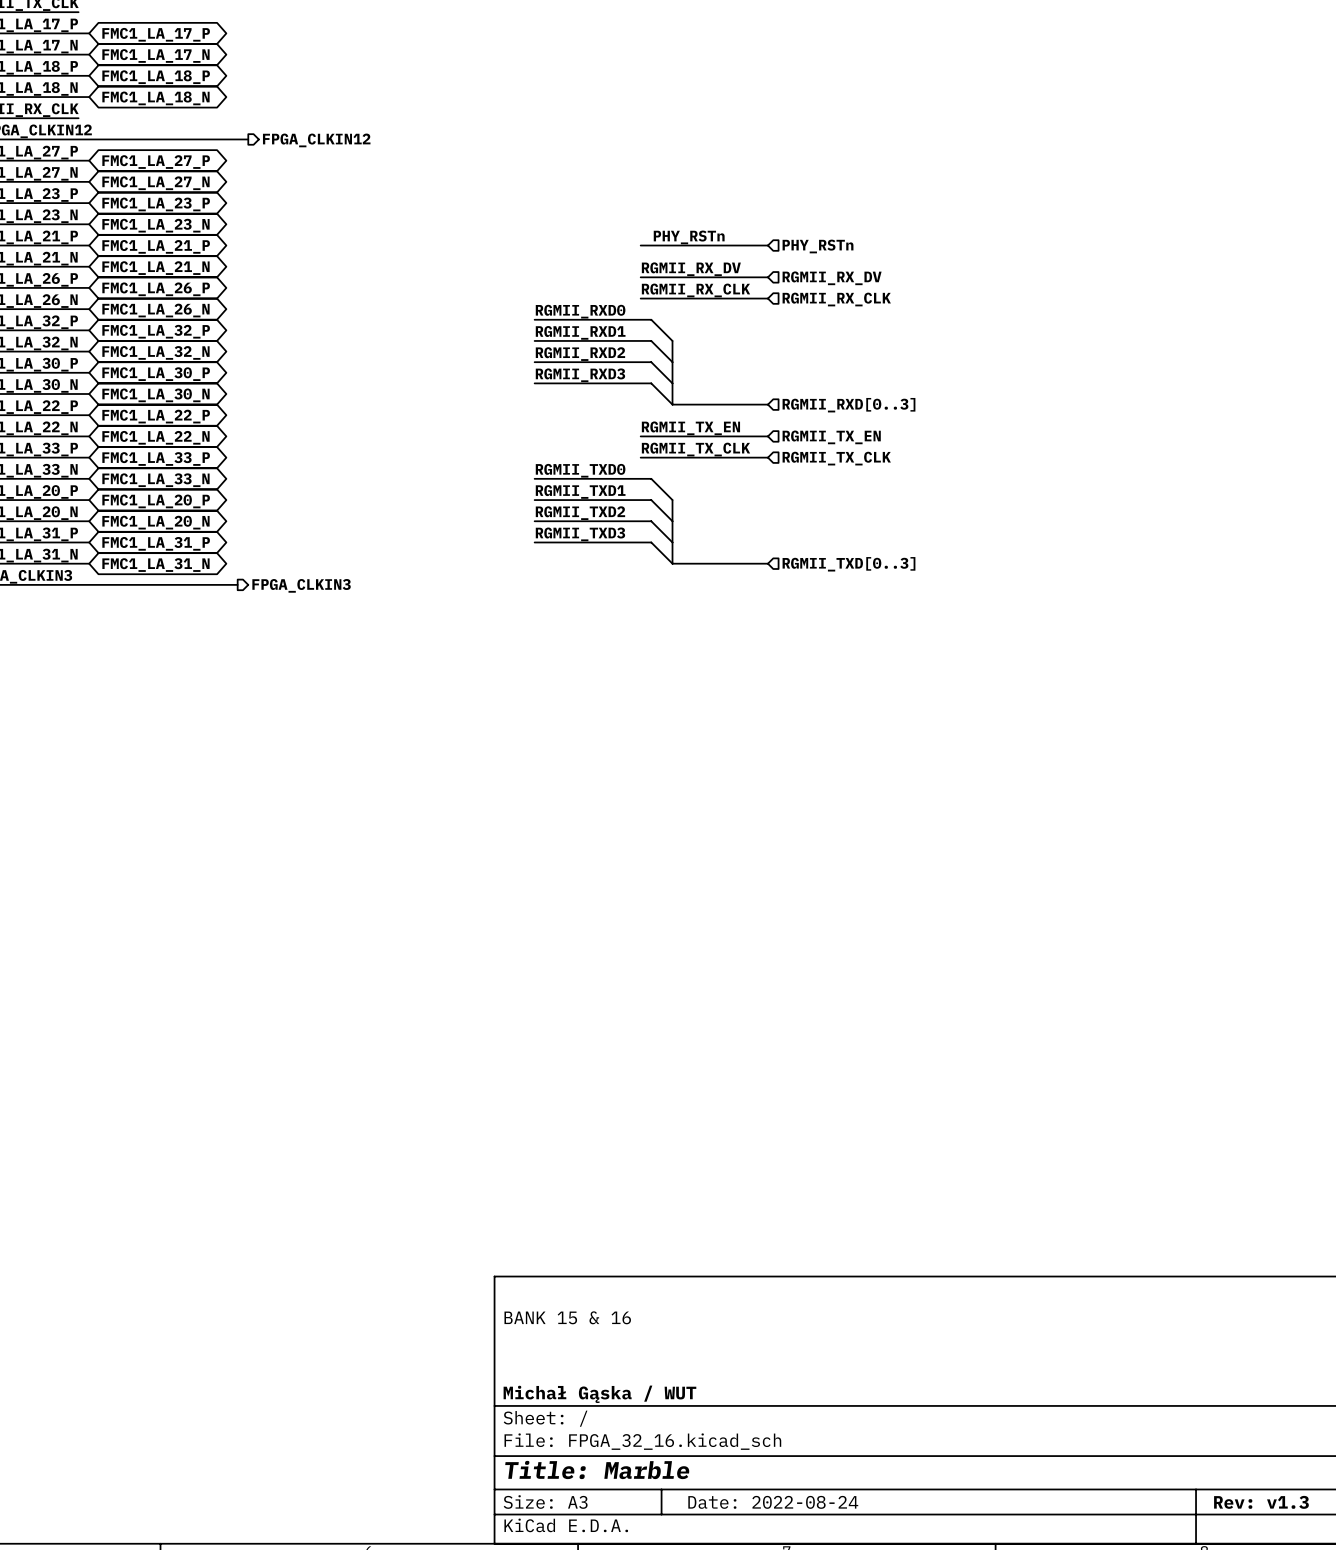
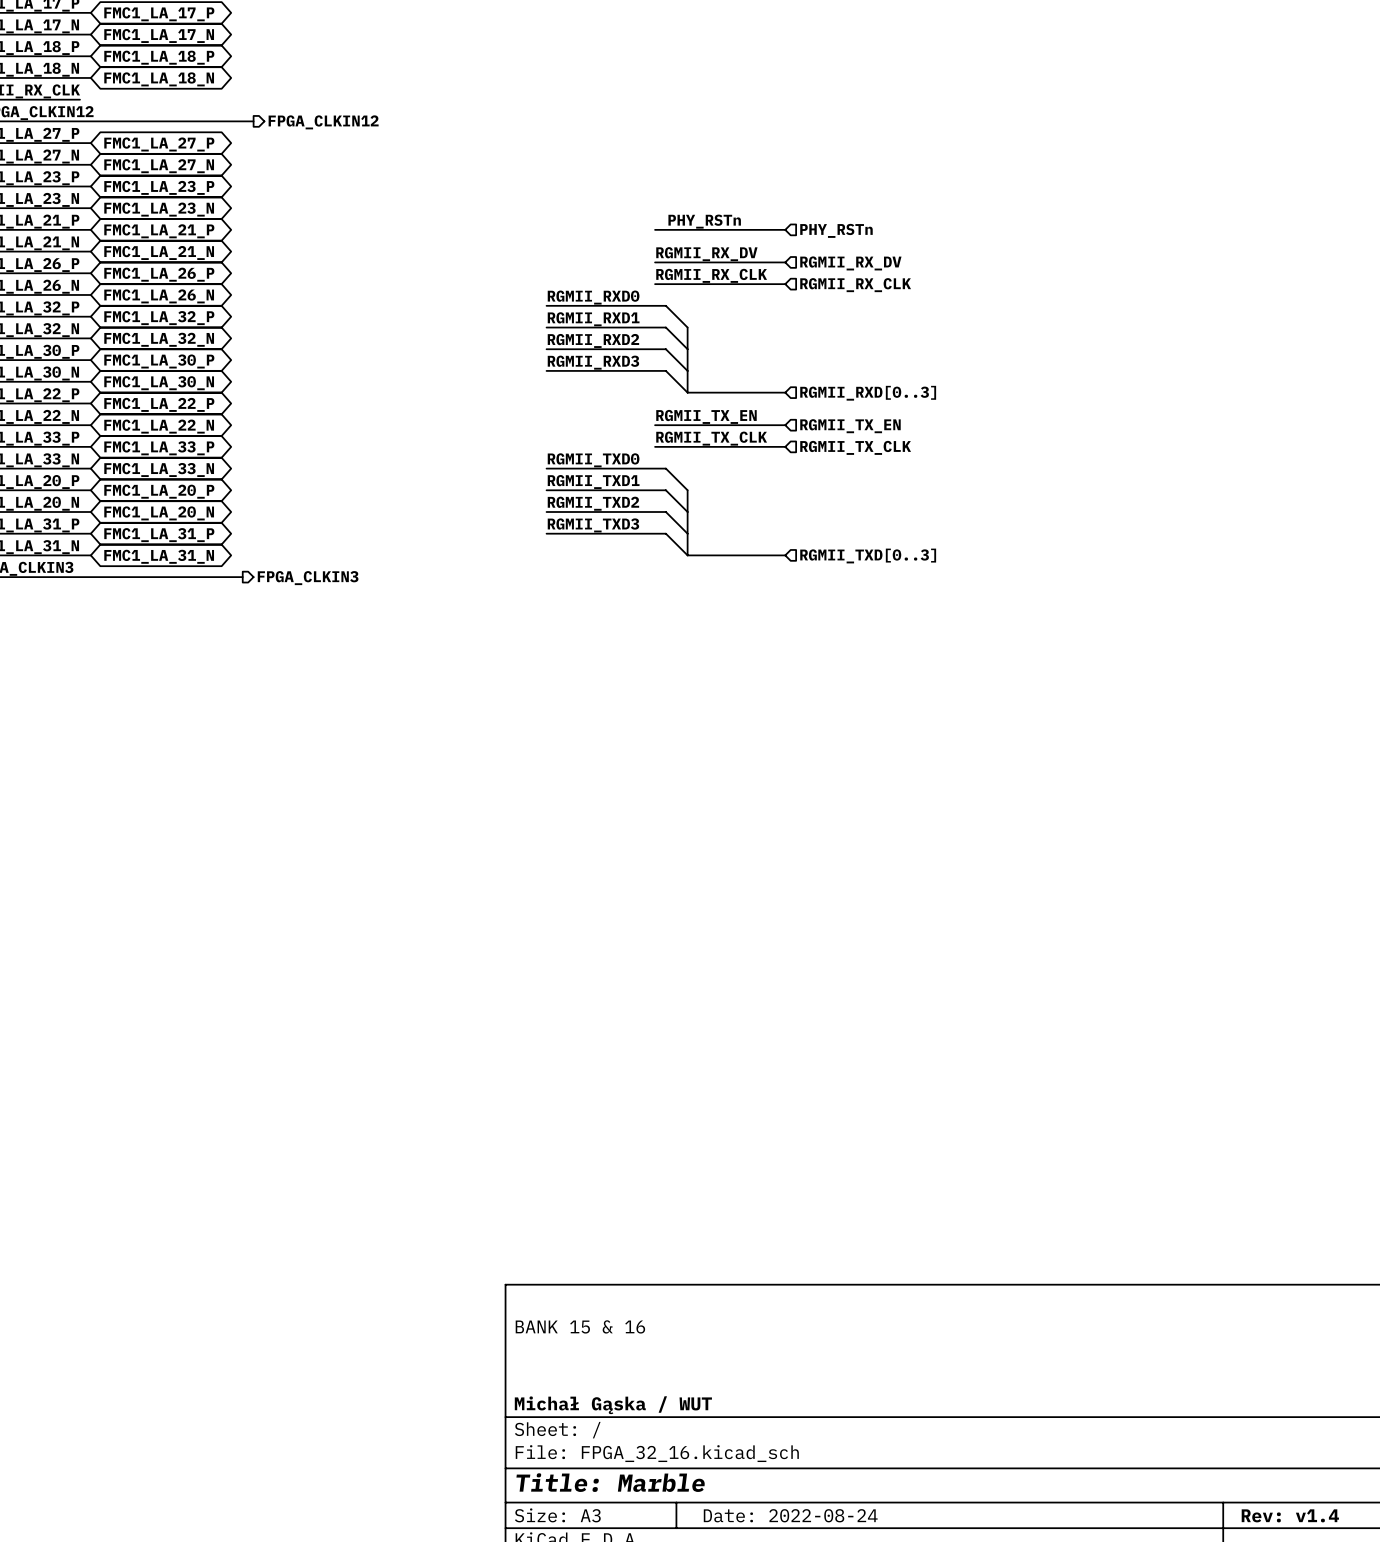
title block: Rev: v1.3 (1261, 1502) -> Rev: v1.4 (1290, 1515)

